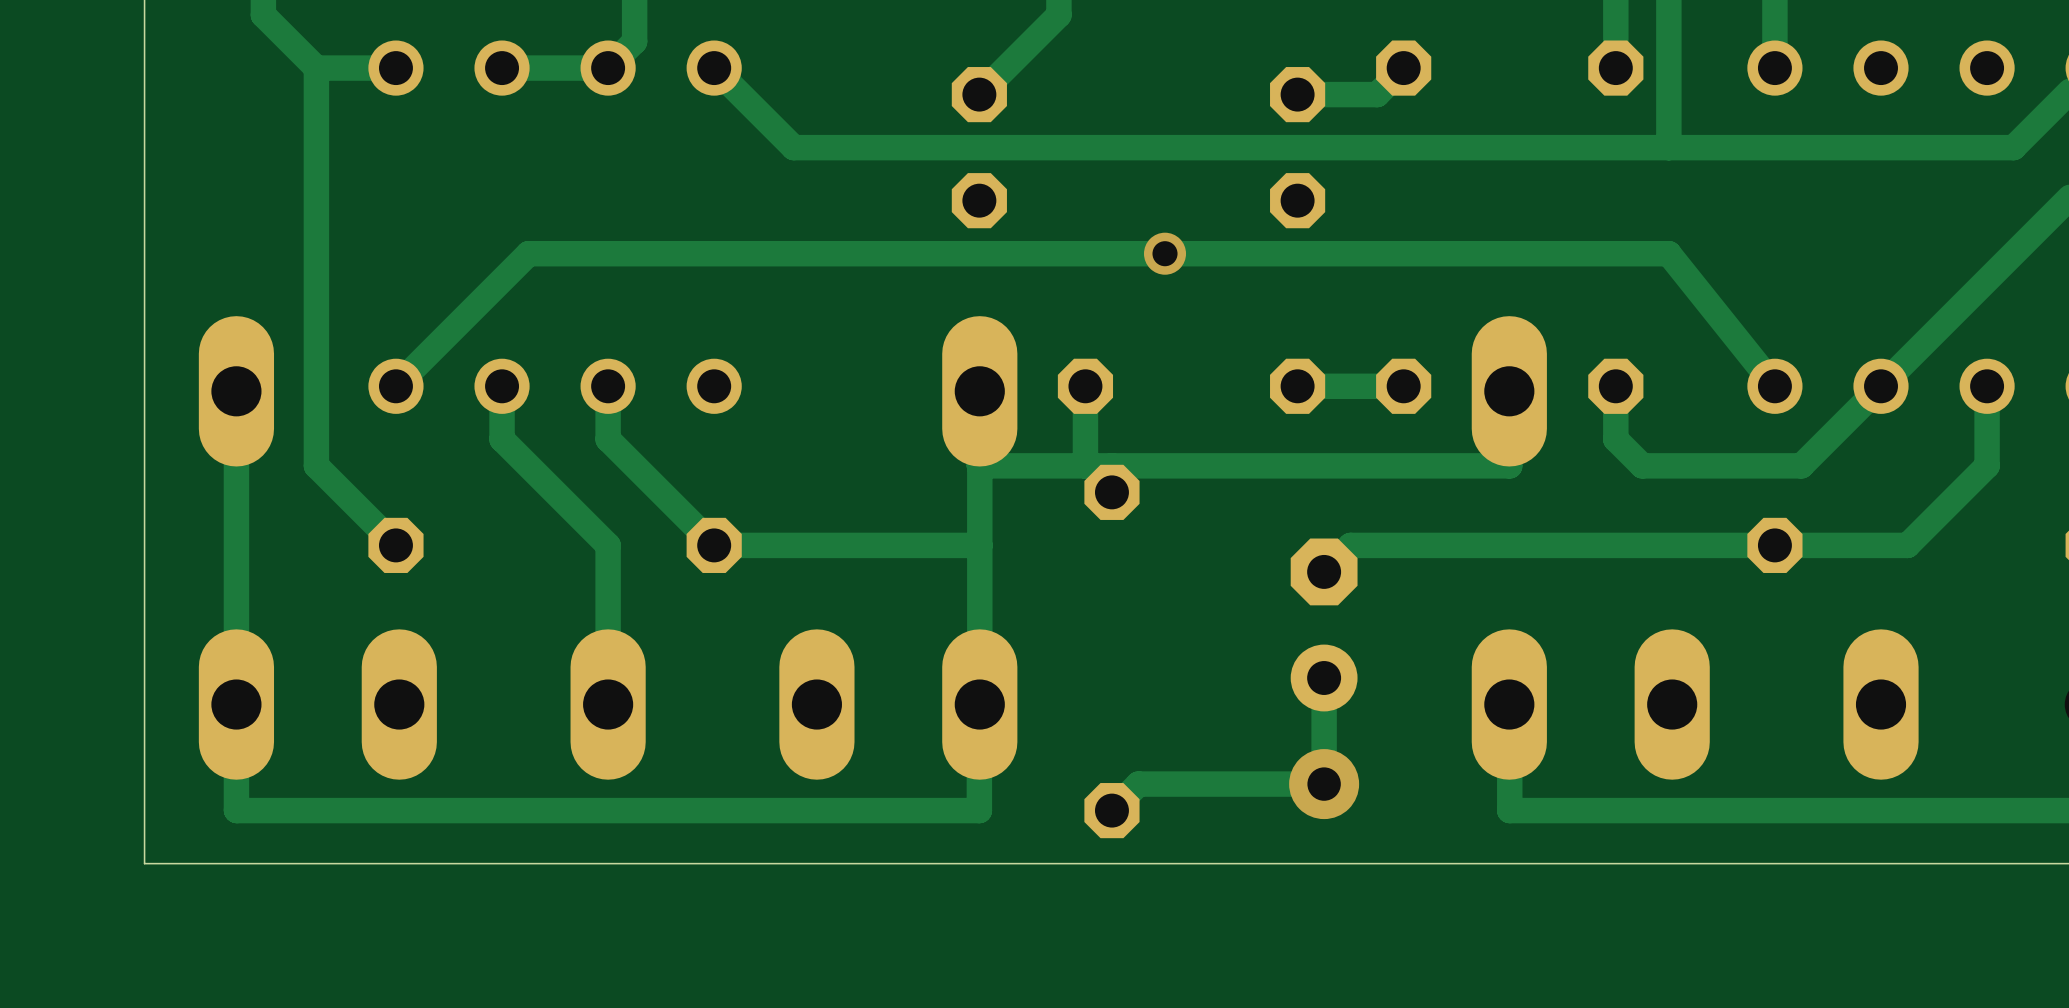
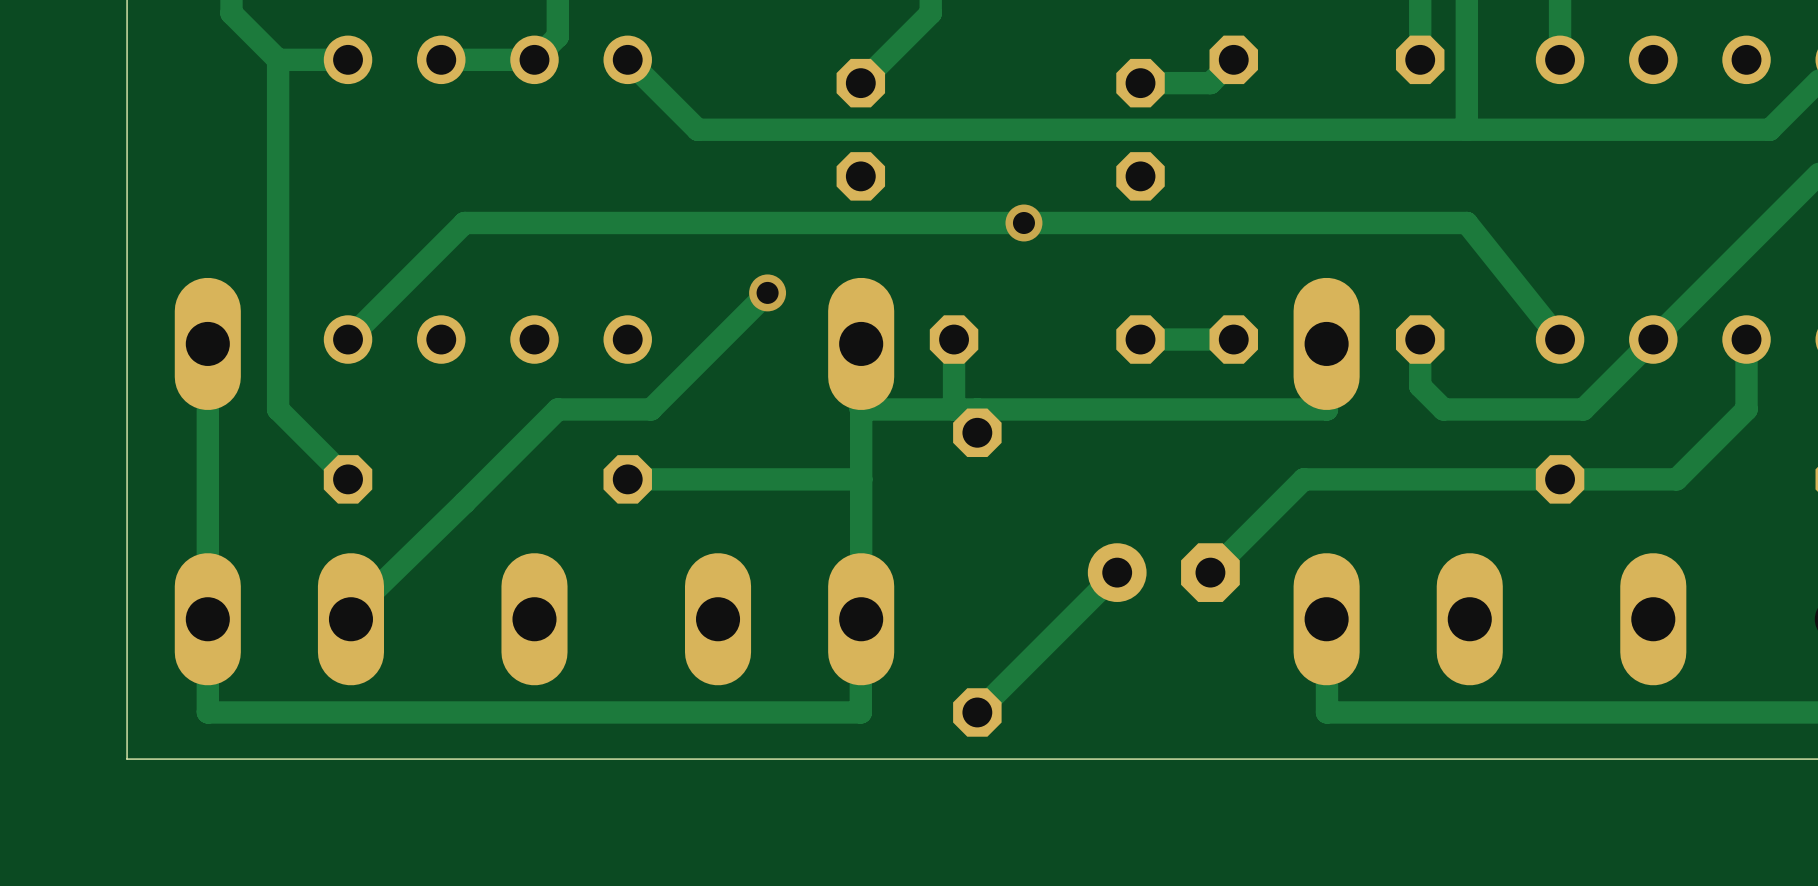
track: none -> (767, 292) (651, 409) (557, 409) (348, 616) (350, 619)
via: none -> (767, 292)
track: (502, 386) (502, 439) (608, 545) (608, 704) -> none
track: (608, 386) (608, 439) (714, 545) -> none
track: (1483, 545) (1350, 545) (1324, 571) -> (1303, 479) (1210, 572)
part rotation: 0° (1324, 624) -> 90° clockwise (1163, 572)
track: (1324, 678) (1324, 784) (1138, 784) -> (1117, 572) (1000, 689)
via: (1324, 784) -> none

